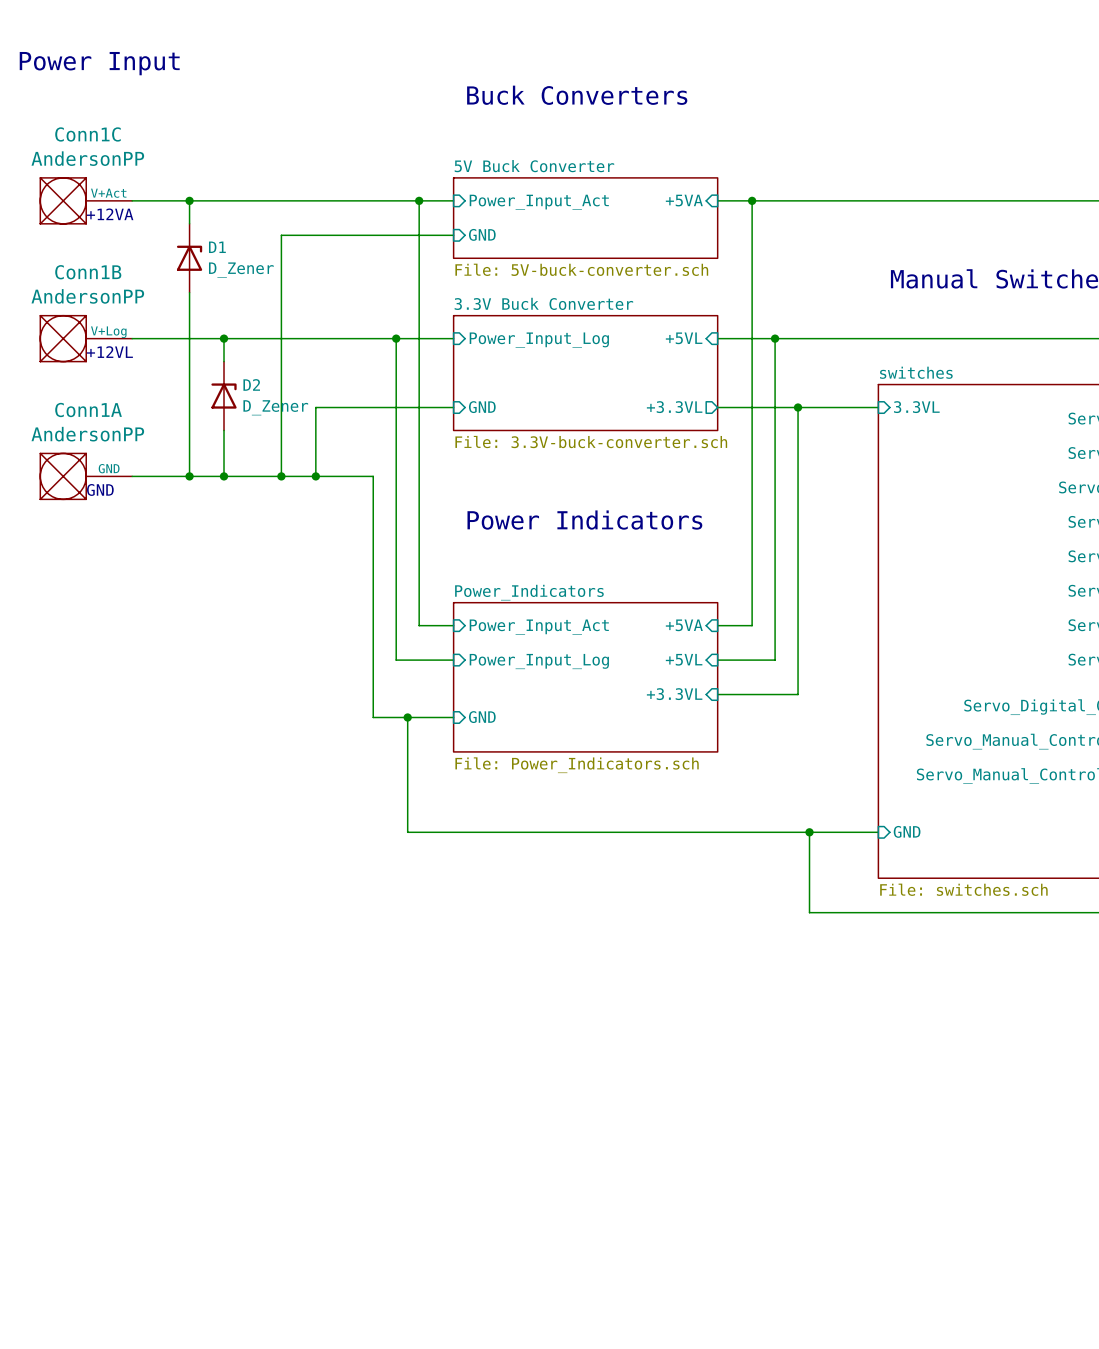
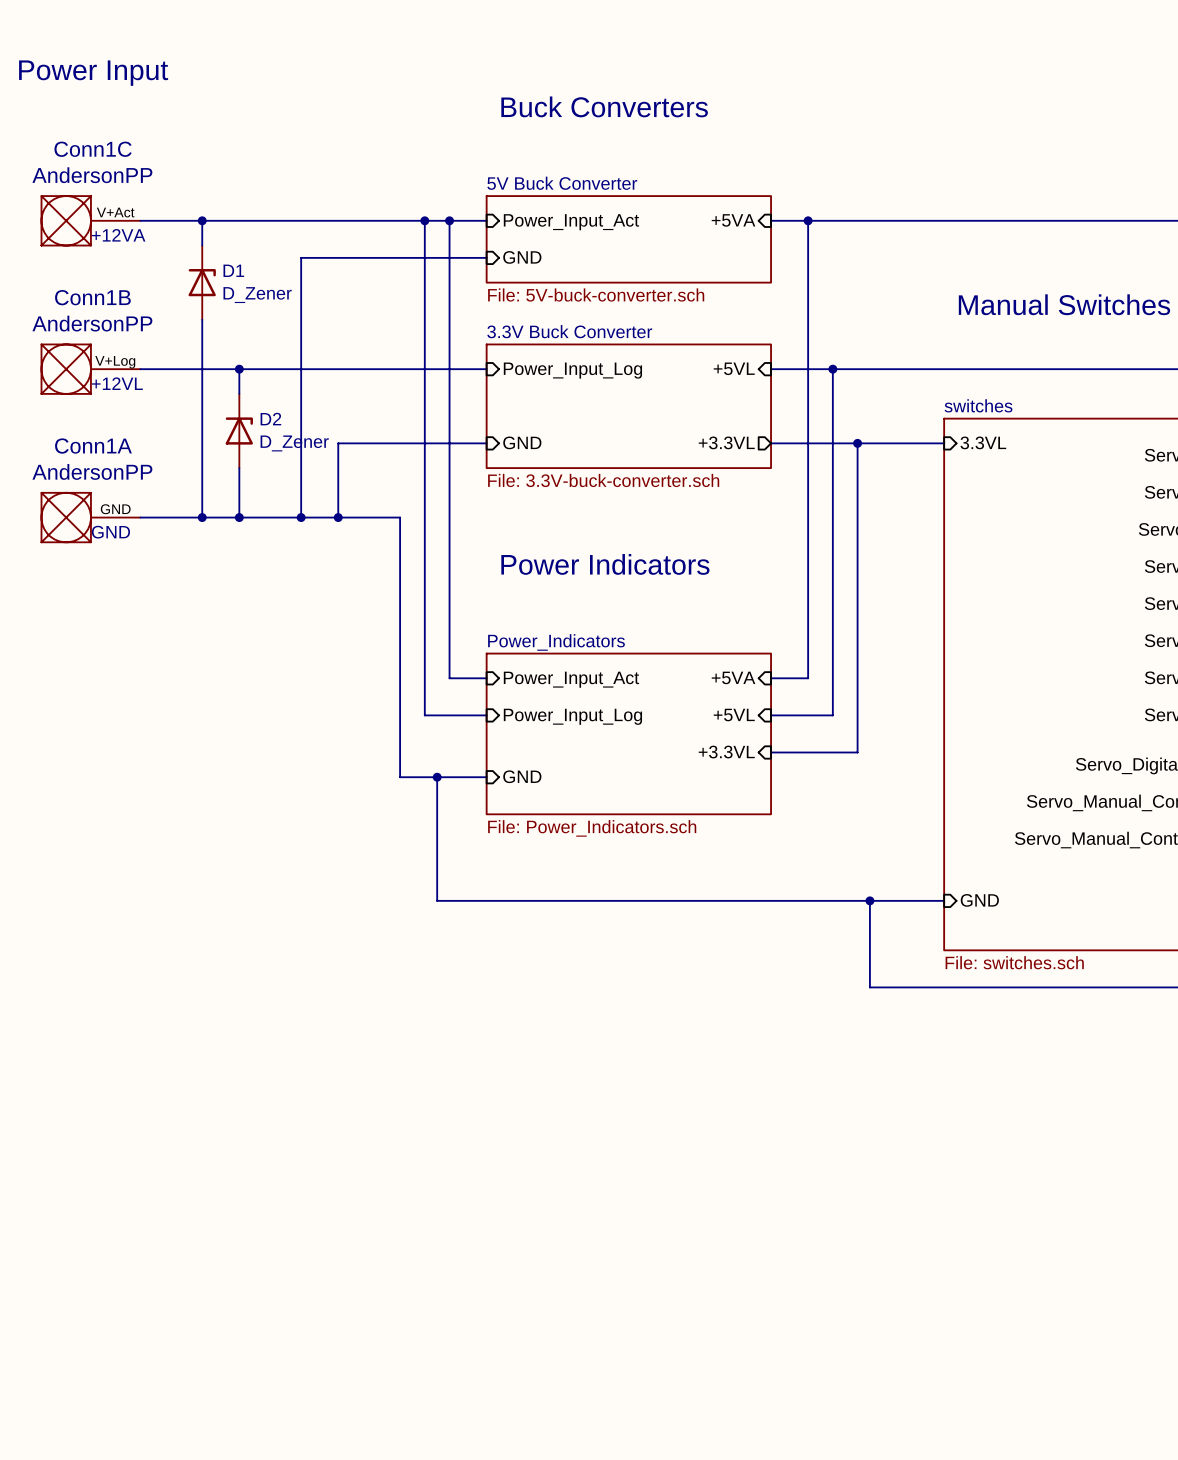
wire: none -> (424, 220) (424, 369)
junction: none -> (424, 220)
junction: (396, 338) -> none

